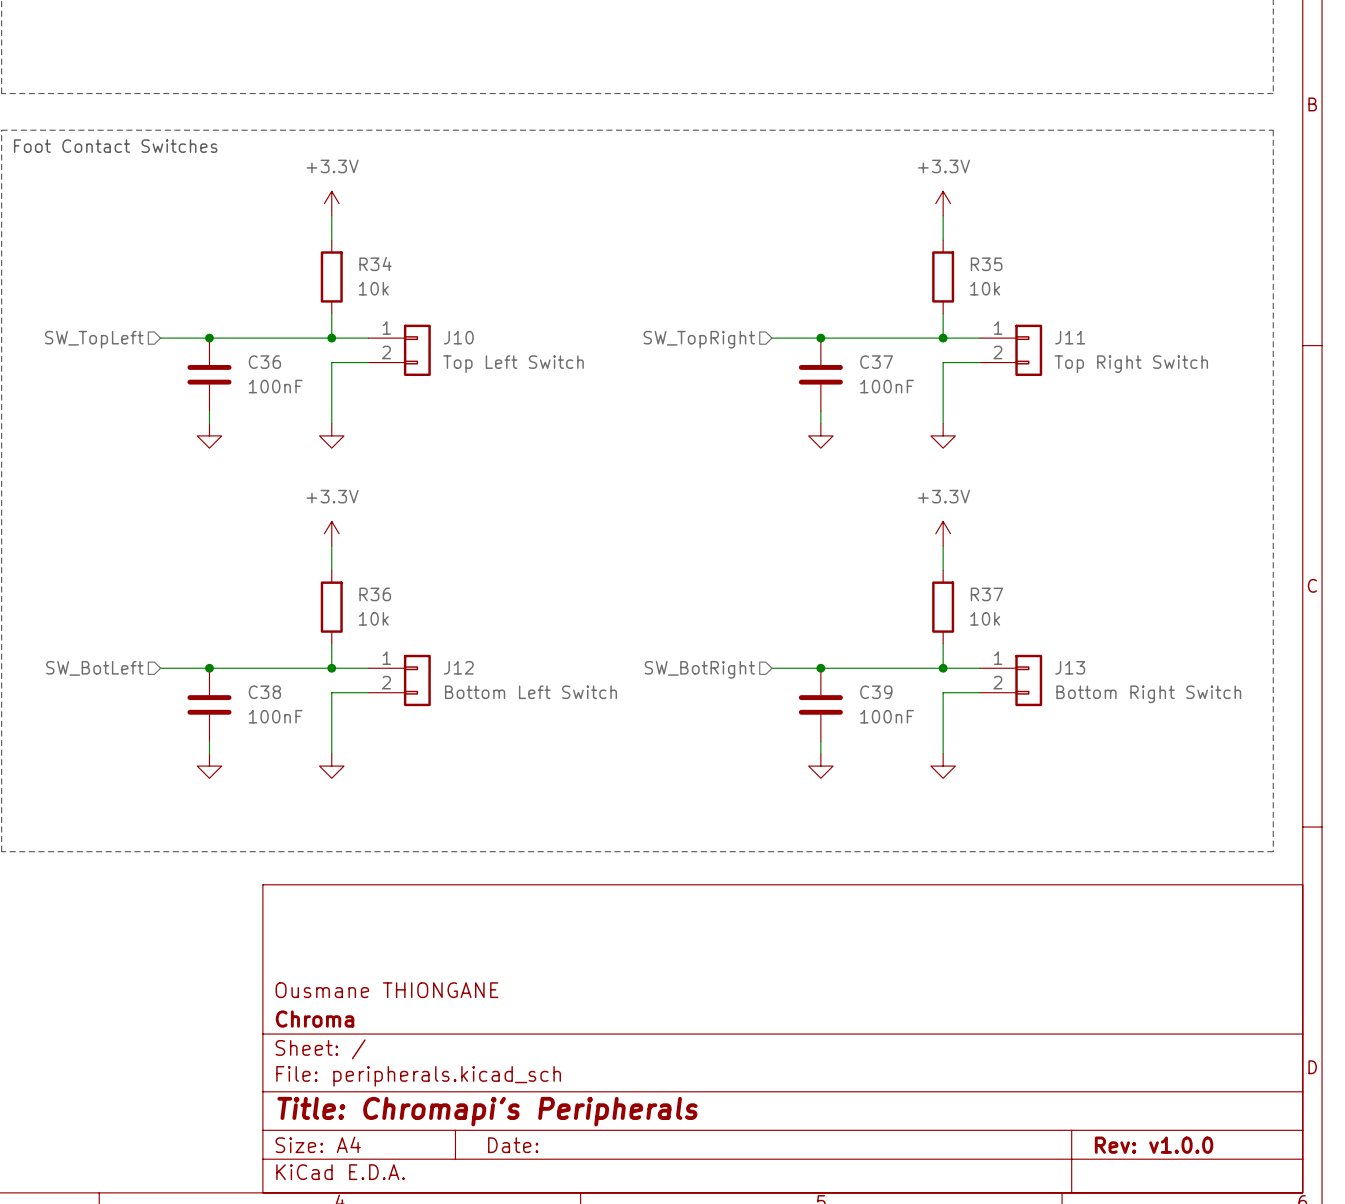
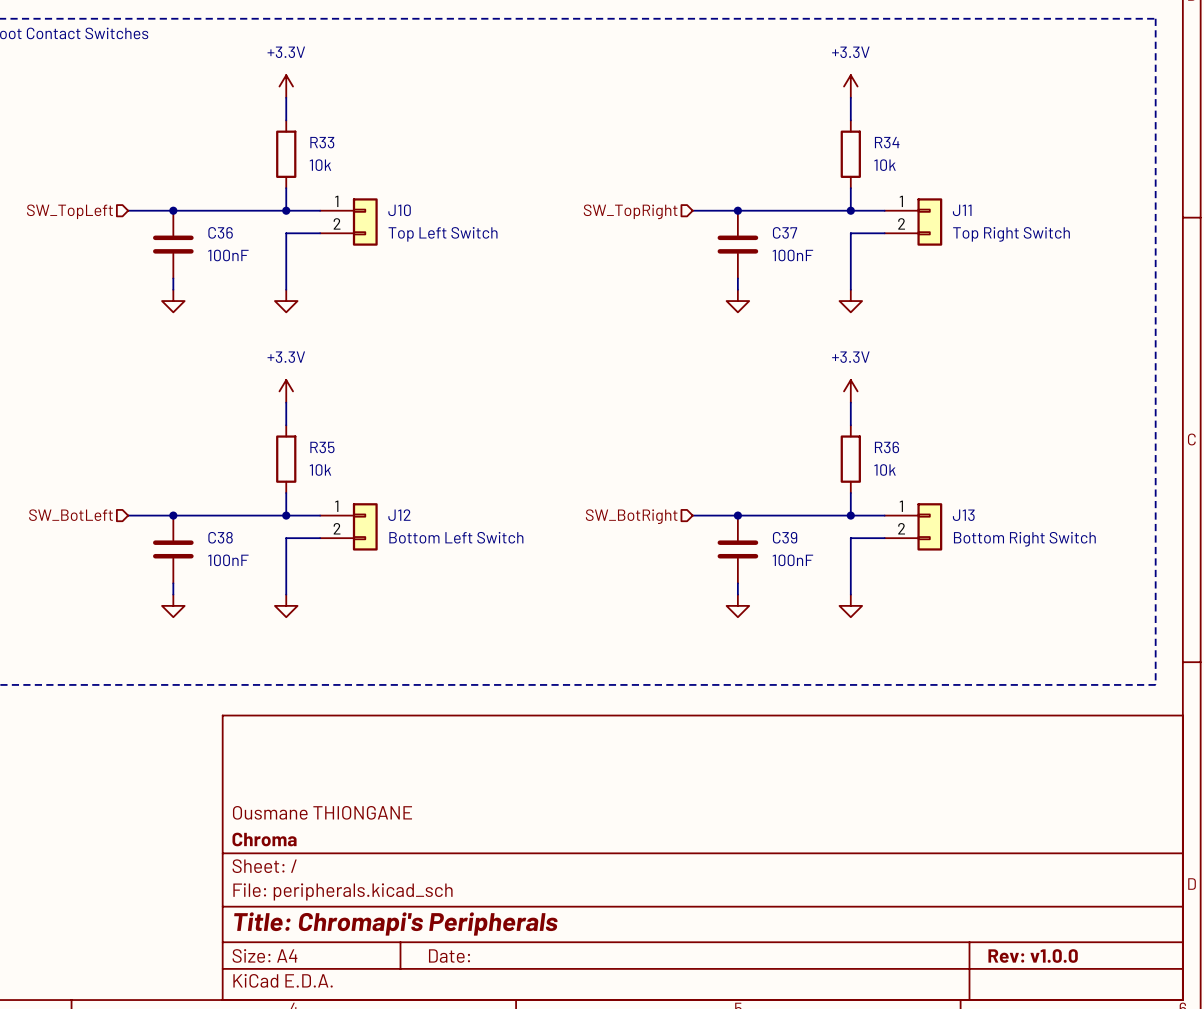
R34 name: R34 (375, 263) -> R33 (322, 142)
R35 name: R35 (986, 264) -> R34 (887, 142)
R36 name: R36 (375, 594) -> R35 (322, 447)
R37 name: R37 (986, 594) -> R36 (886, 447)

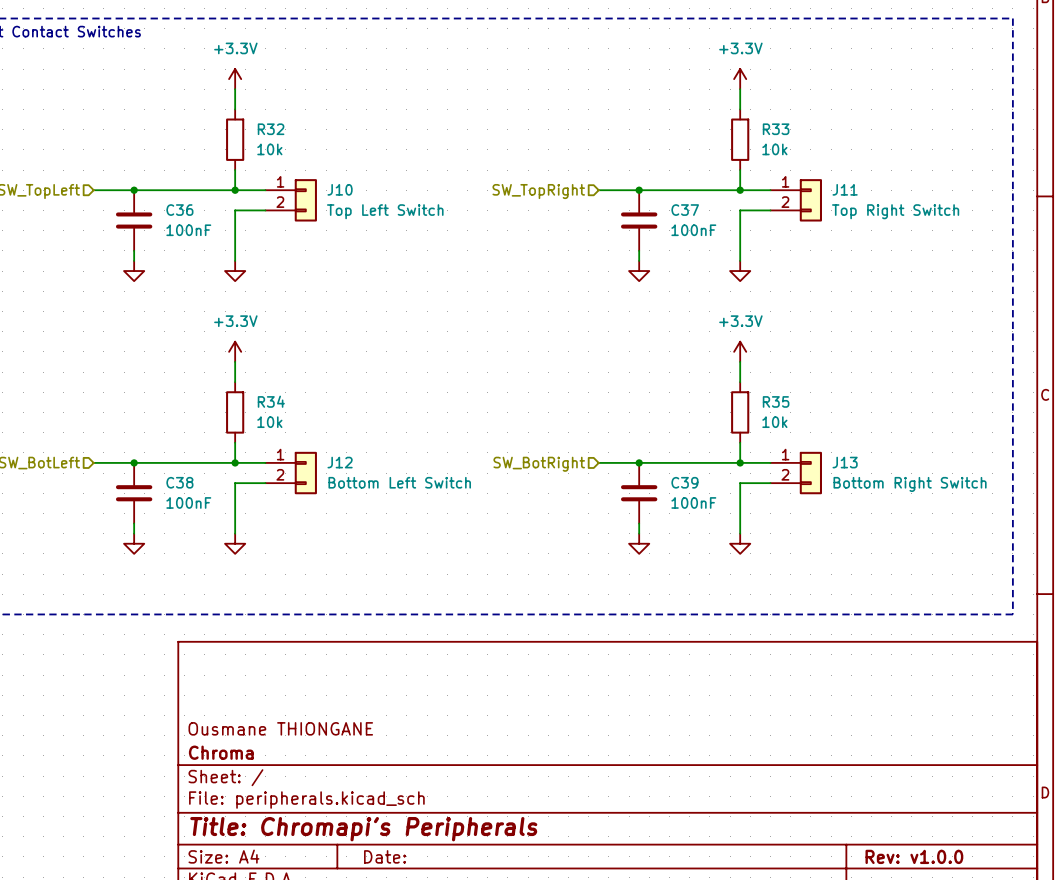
R33 name: R33 (322, 142) -> R32 (271, 129)
R34 name: R34 (887, 142) -> R33 (776, 129)
R35 name: R35 (322, 447) -> R34 (271, 401)
R36 name: R36 (886, 447) -> R35 (776, 401)

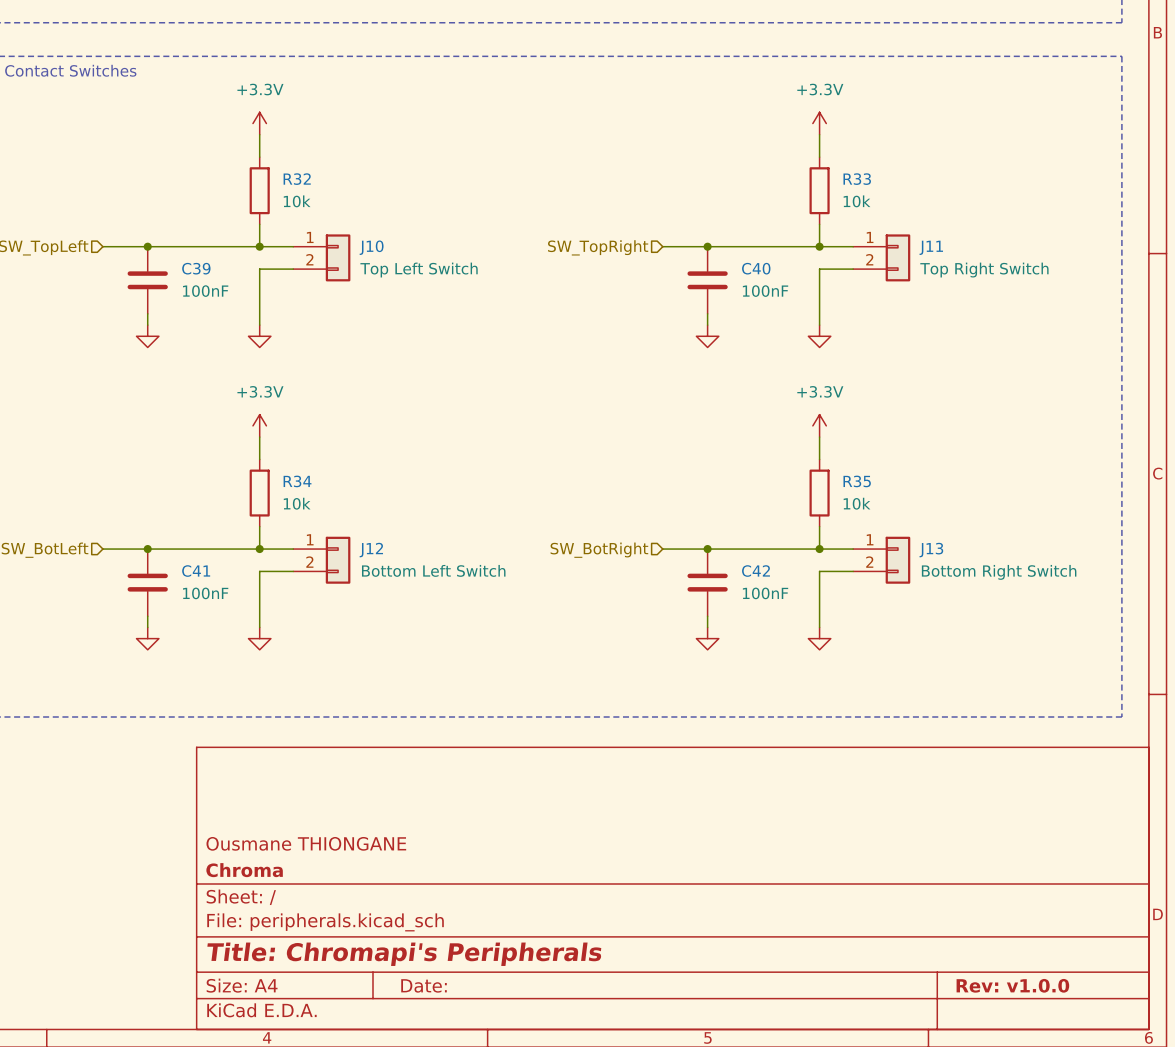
C36 name: C36 (179, 210) -> C39 (196, 268)
C37 name: C37 (685, 210) -> C40 (756, 268)
C38 name: C38 (179, 482) -> C41 (196, 571)
C39 name: C39 (684, 482) -> C42 (755, 571)

